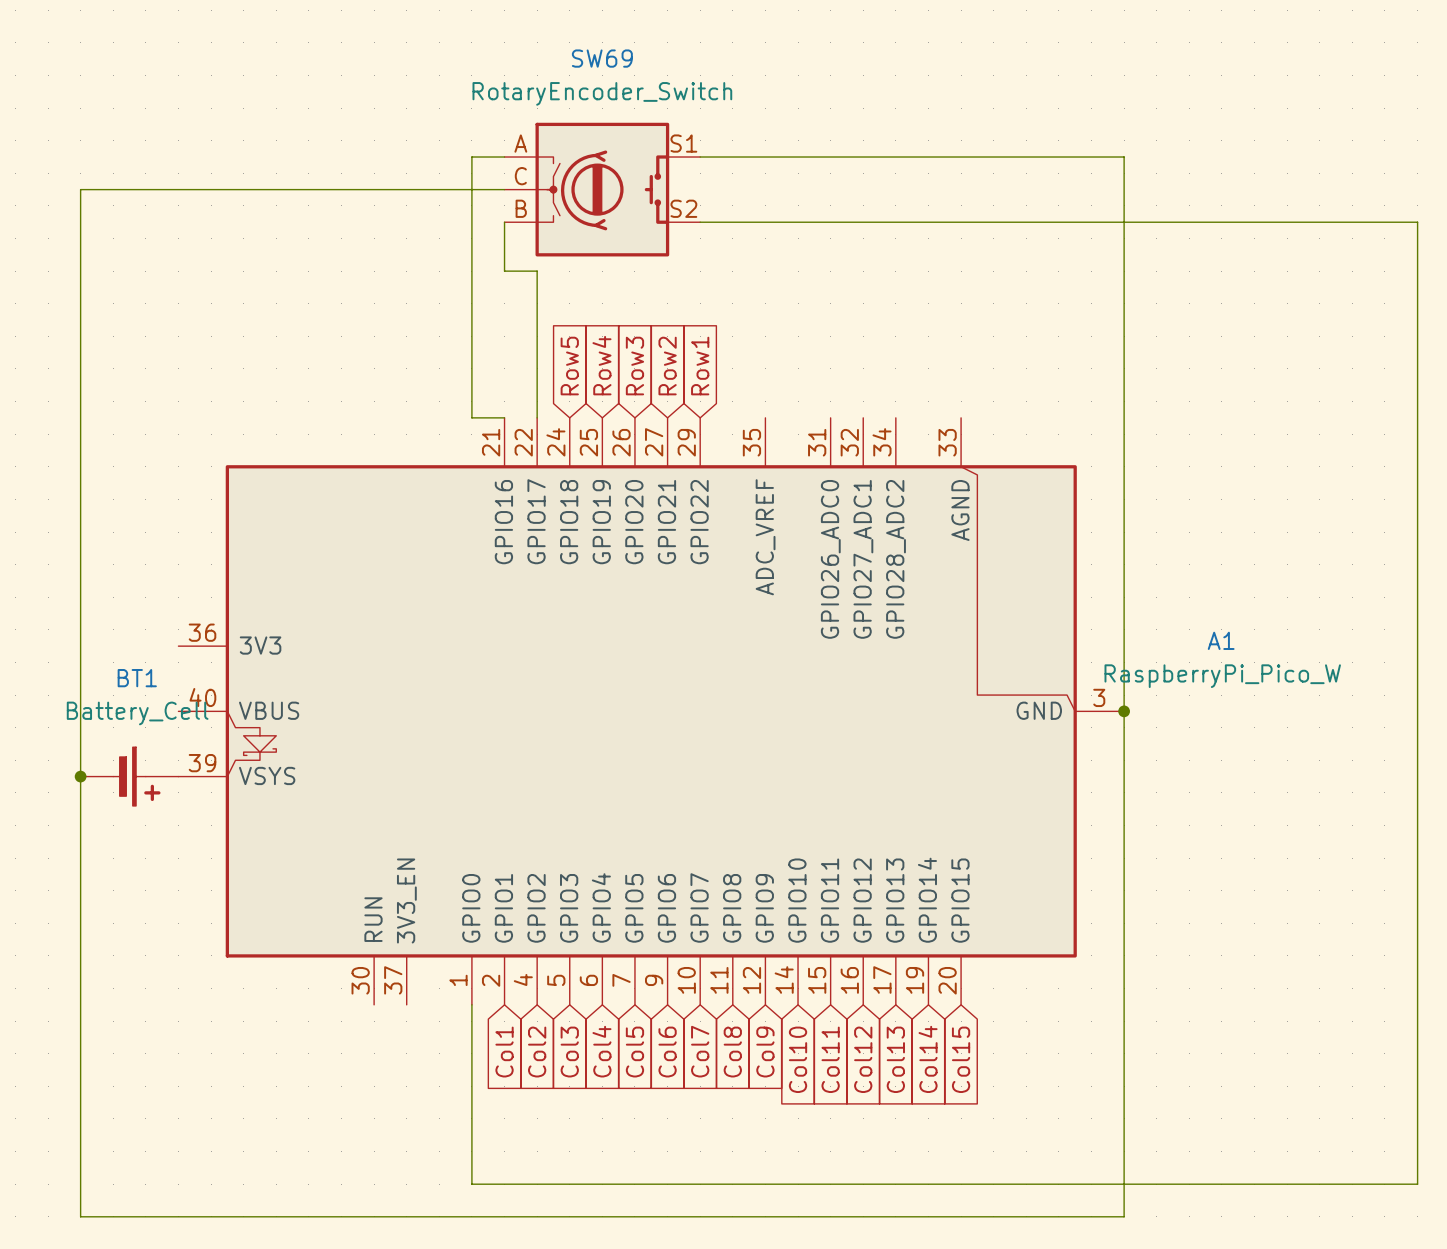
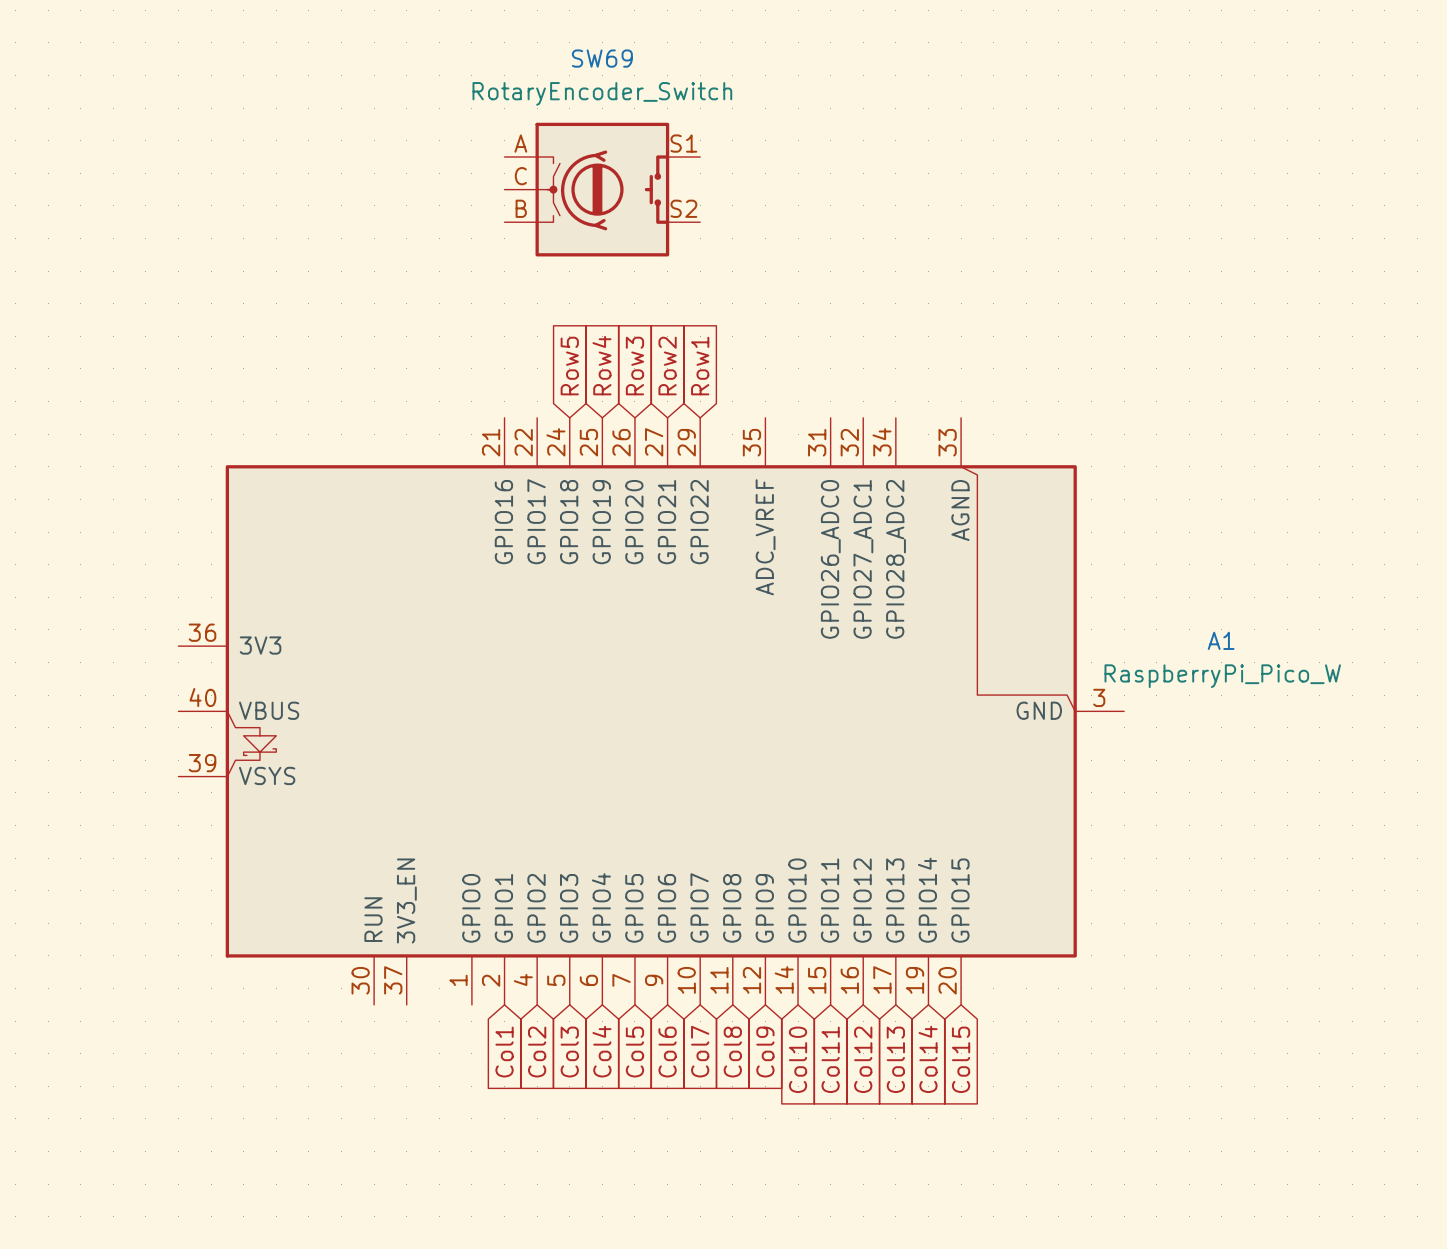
wire: (504, 157) (471, 157) (471, 417) (504, 417) -> none
wire: (700, 157) (1124, 157) (1124, 1216) (80, 1216) (80, 189) (504, 189) -> none
wire: (504, 222) (504, 271) (537, 271) (537, 417) -> none
wire: (700, 222) (1417, 222) (1417, 1184) (471, 1184) (471, 1004) -> none
junction: (1124, 711) -> none
junction: (80, 776) -> none
BT1: Battery_Cell (129, 776) -> none

